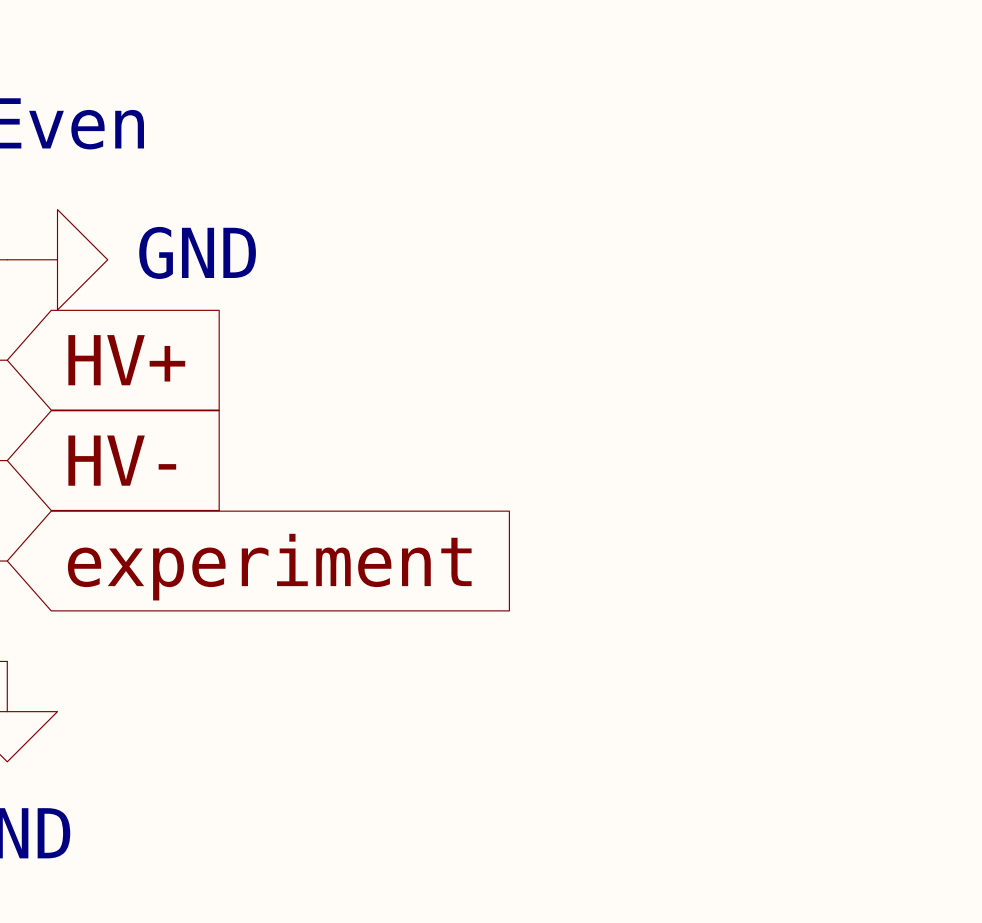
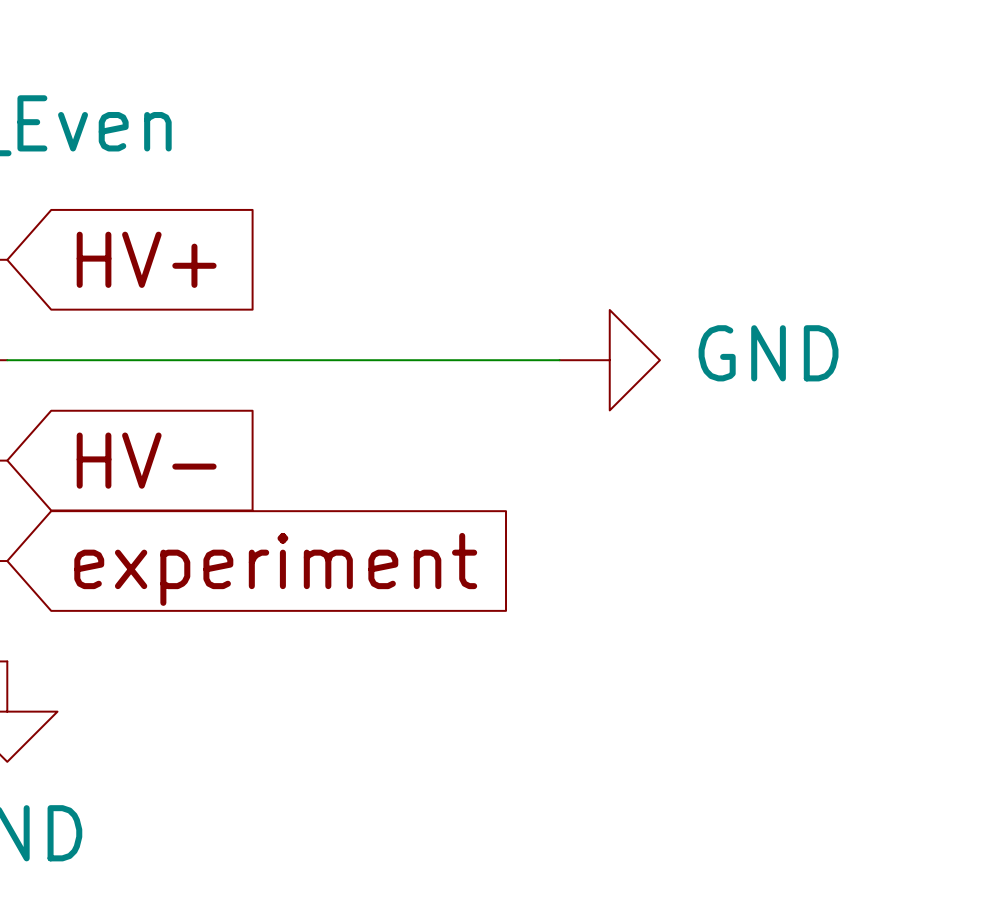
power symbol position: GND (57, 259) -> GND (609, 360)
wire: none -> (7, 360) (559, 360)
global label position: HV+ (126, 360) -> HV+ (146, 259)

